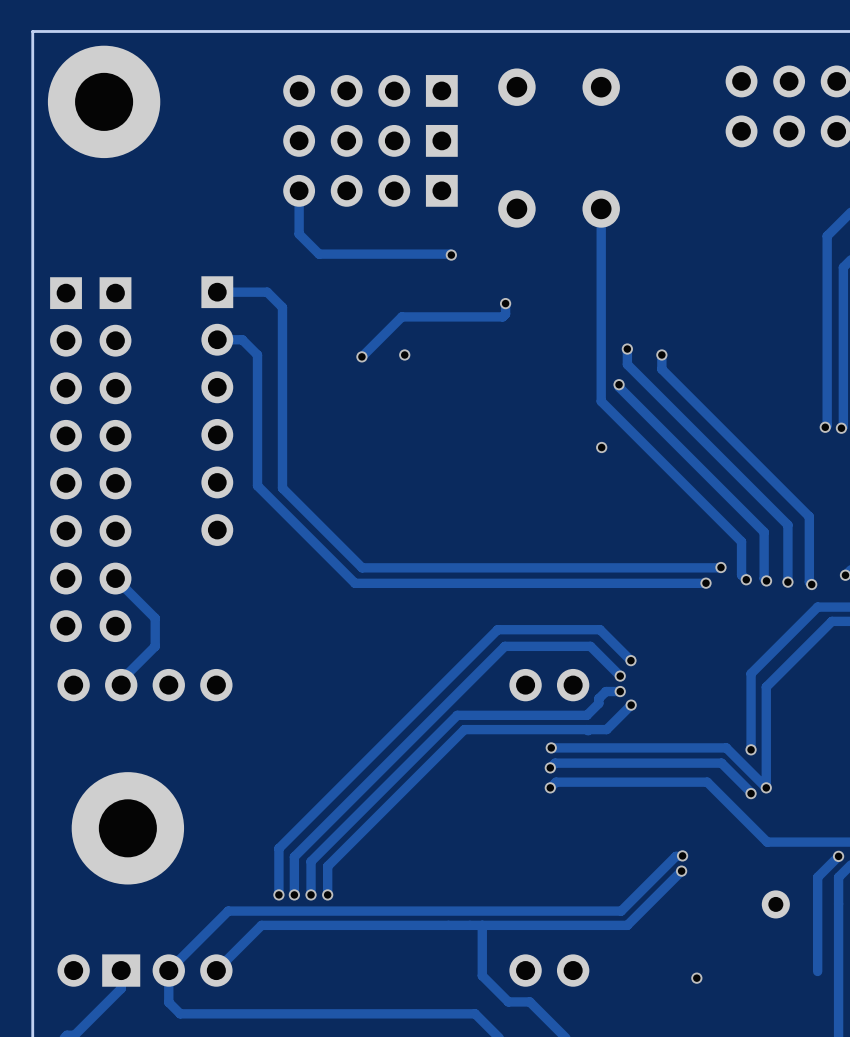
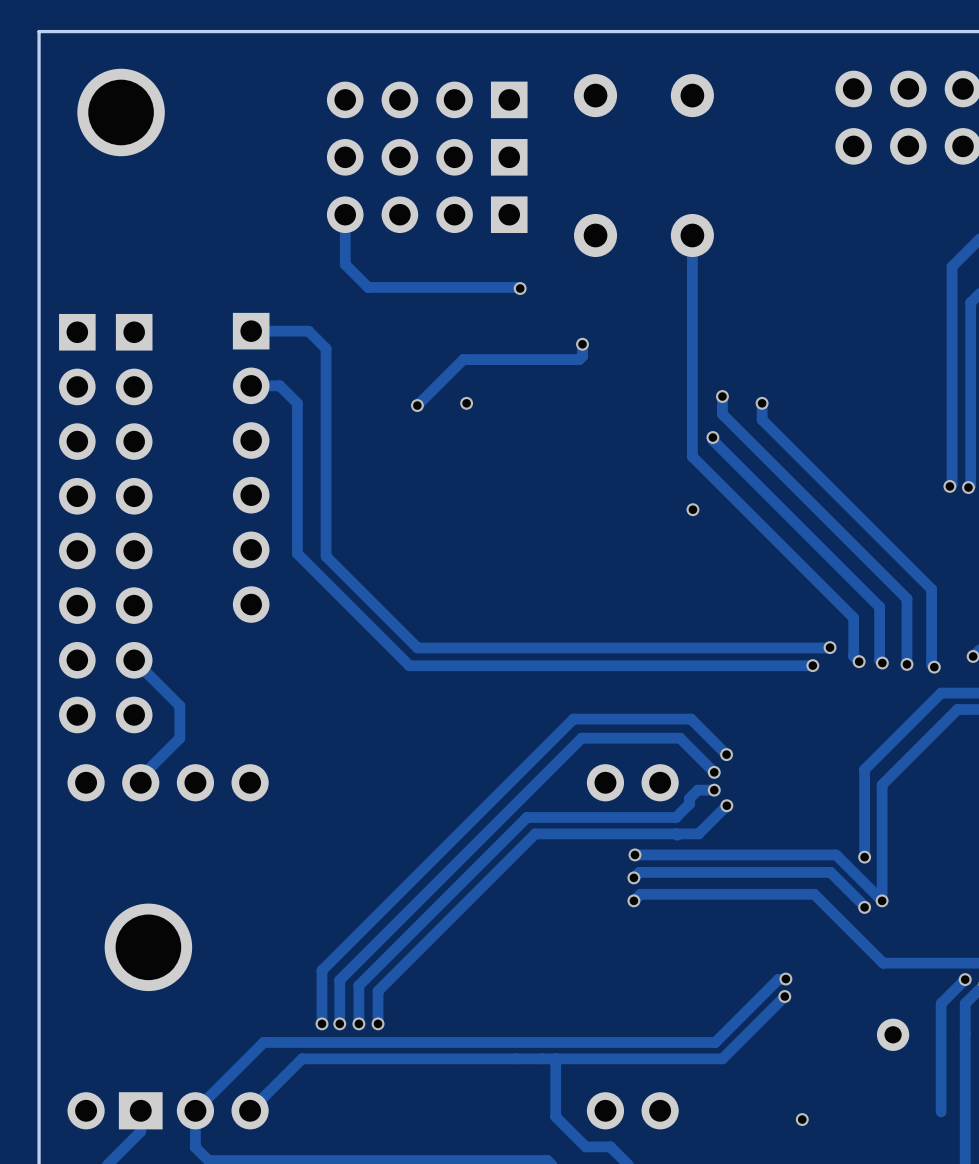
part footprint: [47, 45, 161, 159] -> [77, 68, 165, 157]
part footprint: [71, 772, 185, 885] -> [104, 903, 193, 992]

